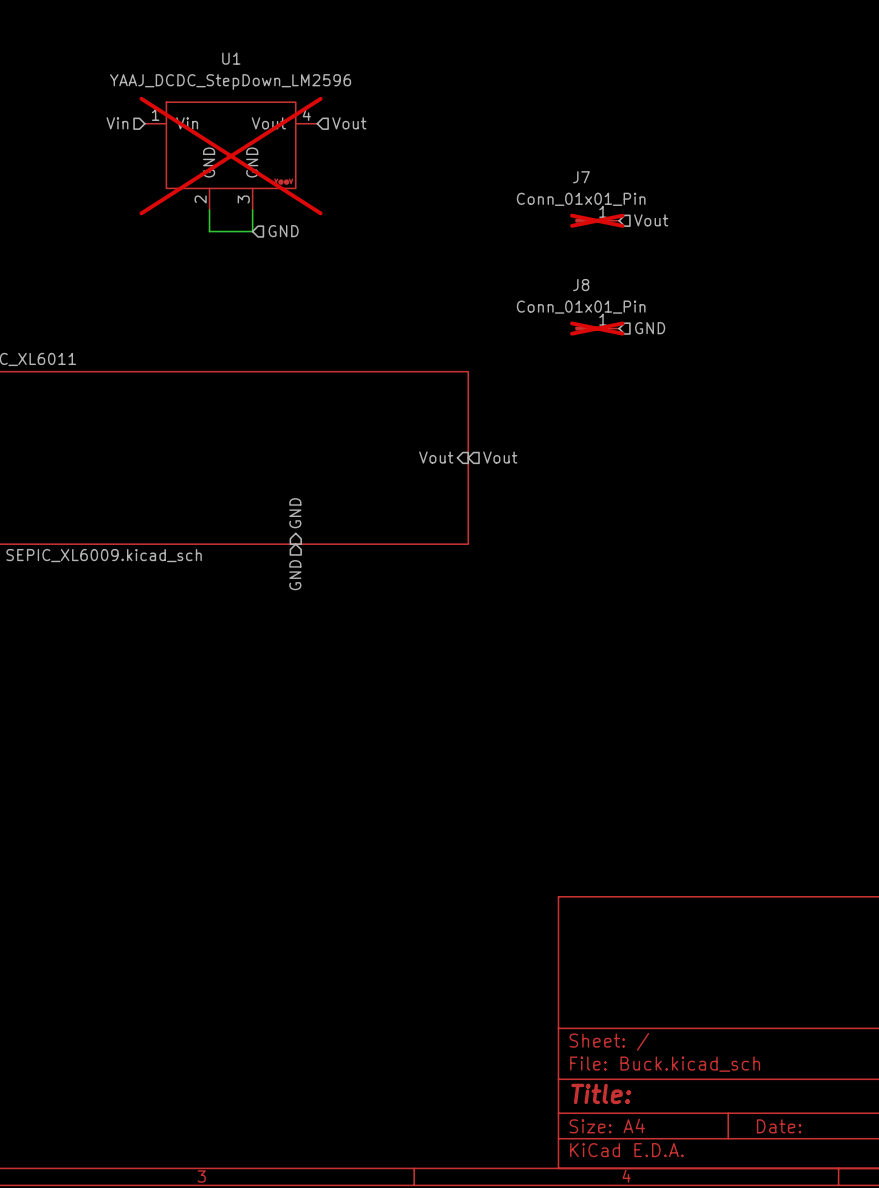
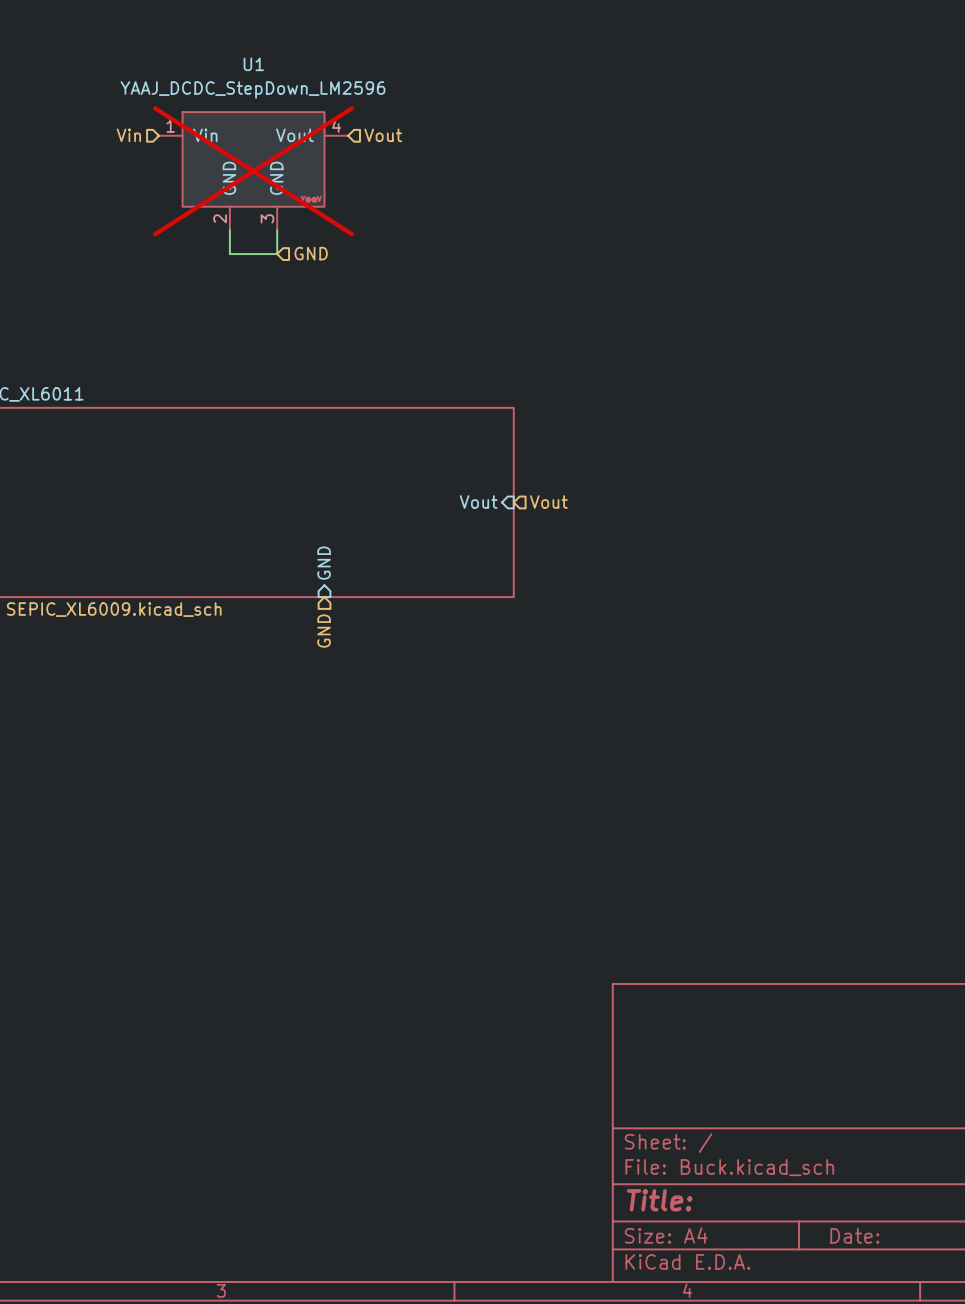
J7: Conn_01x01_Pin (597, 220) -> none
hierarchical label: Vout (651, 220) -> none
J8: Conn_01x01_Pin (597, 328) -> none
hierarchical label: GND (650, 328) -> none

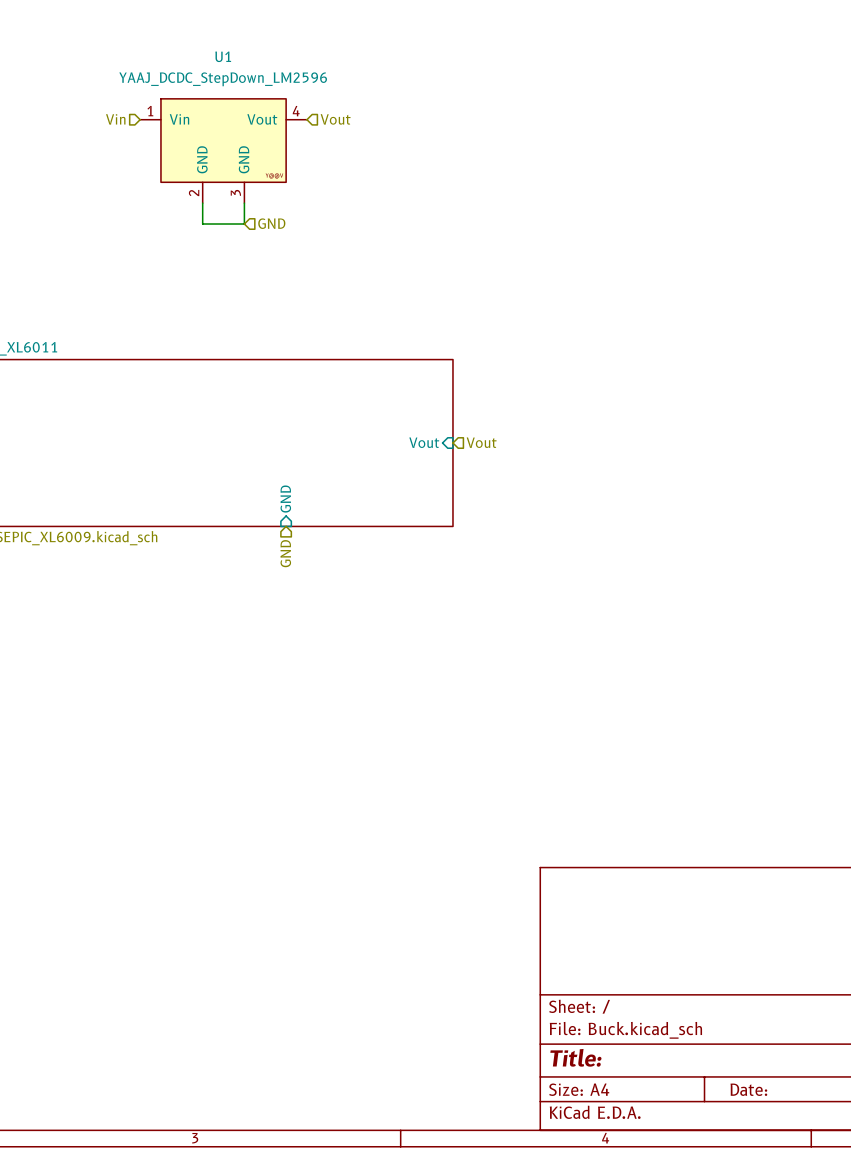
U1 do-not-place cross: (253, 171) -> none

